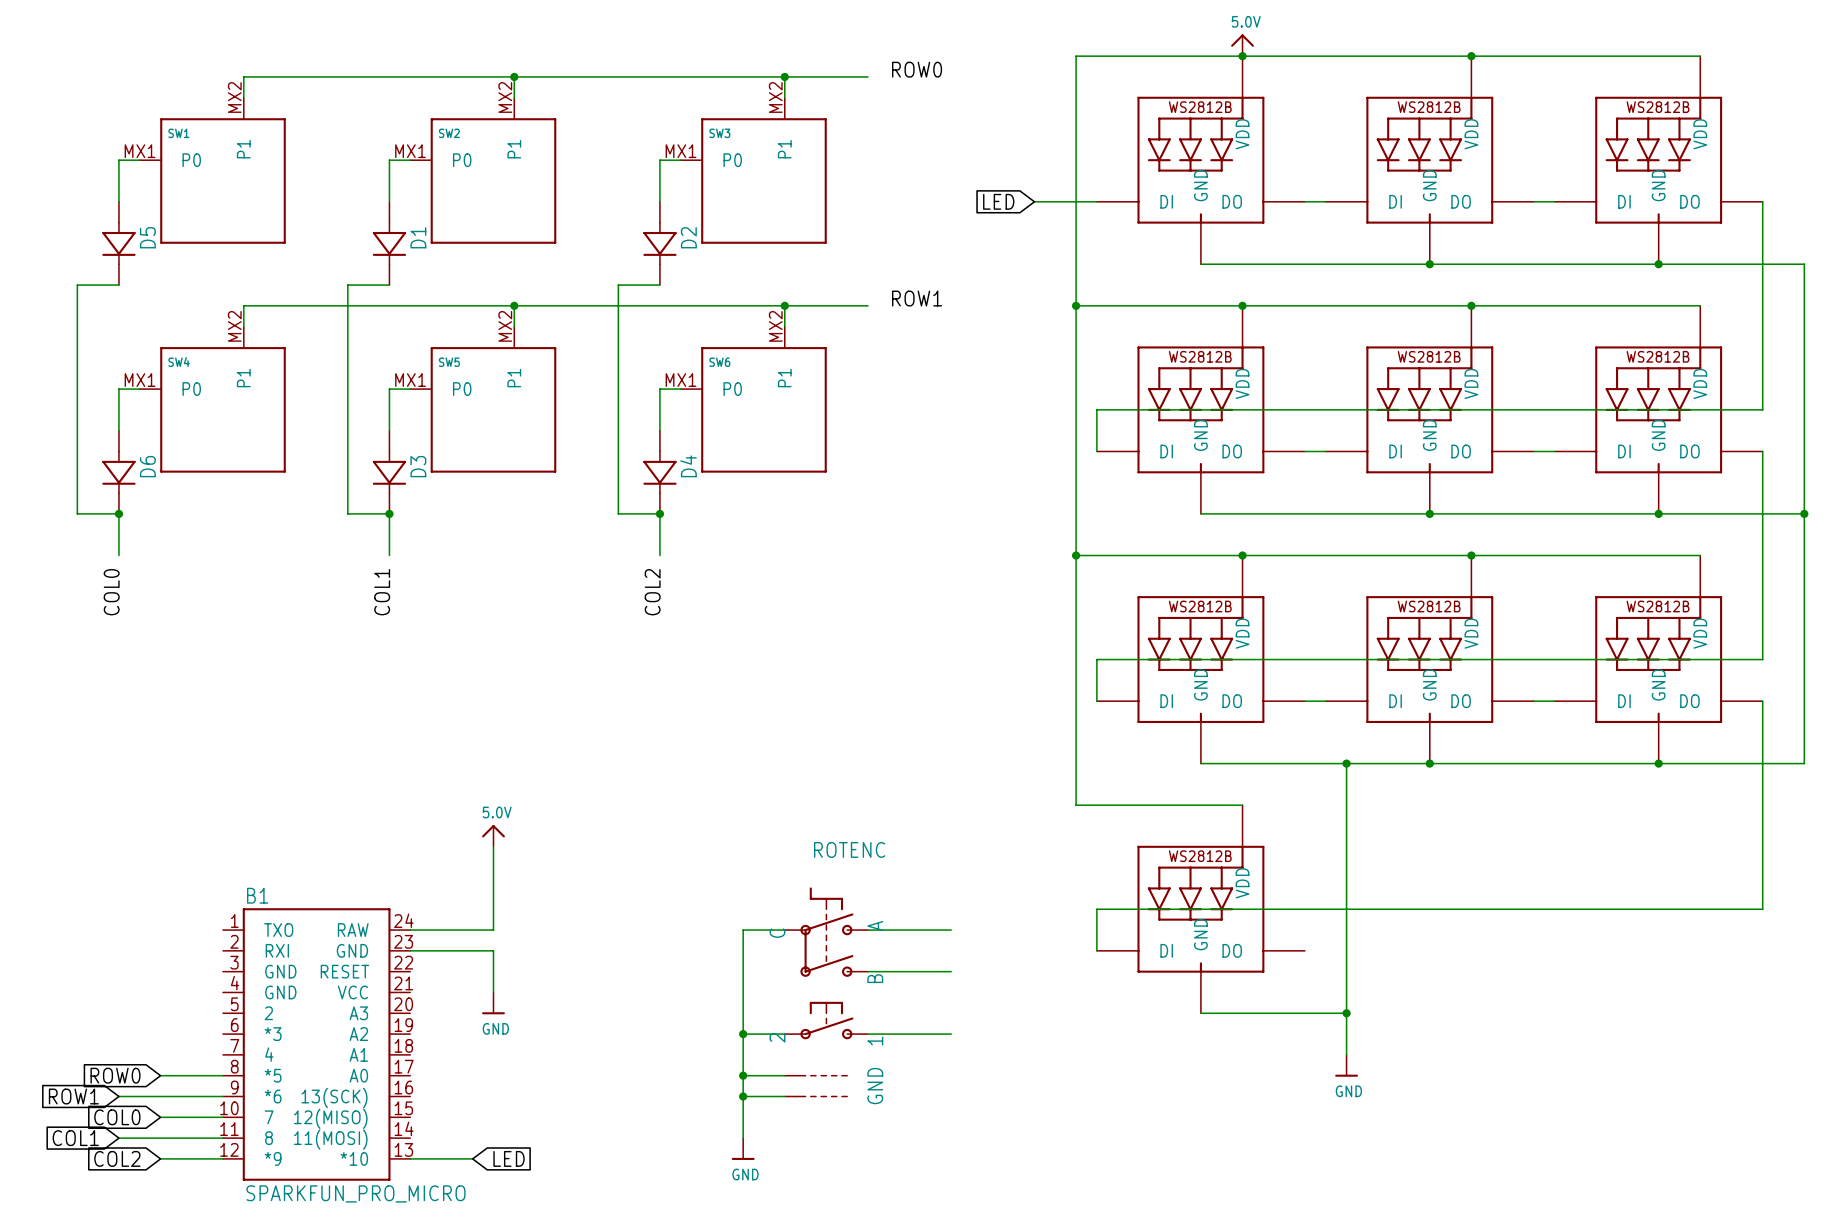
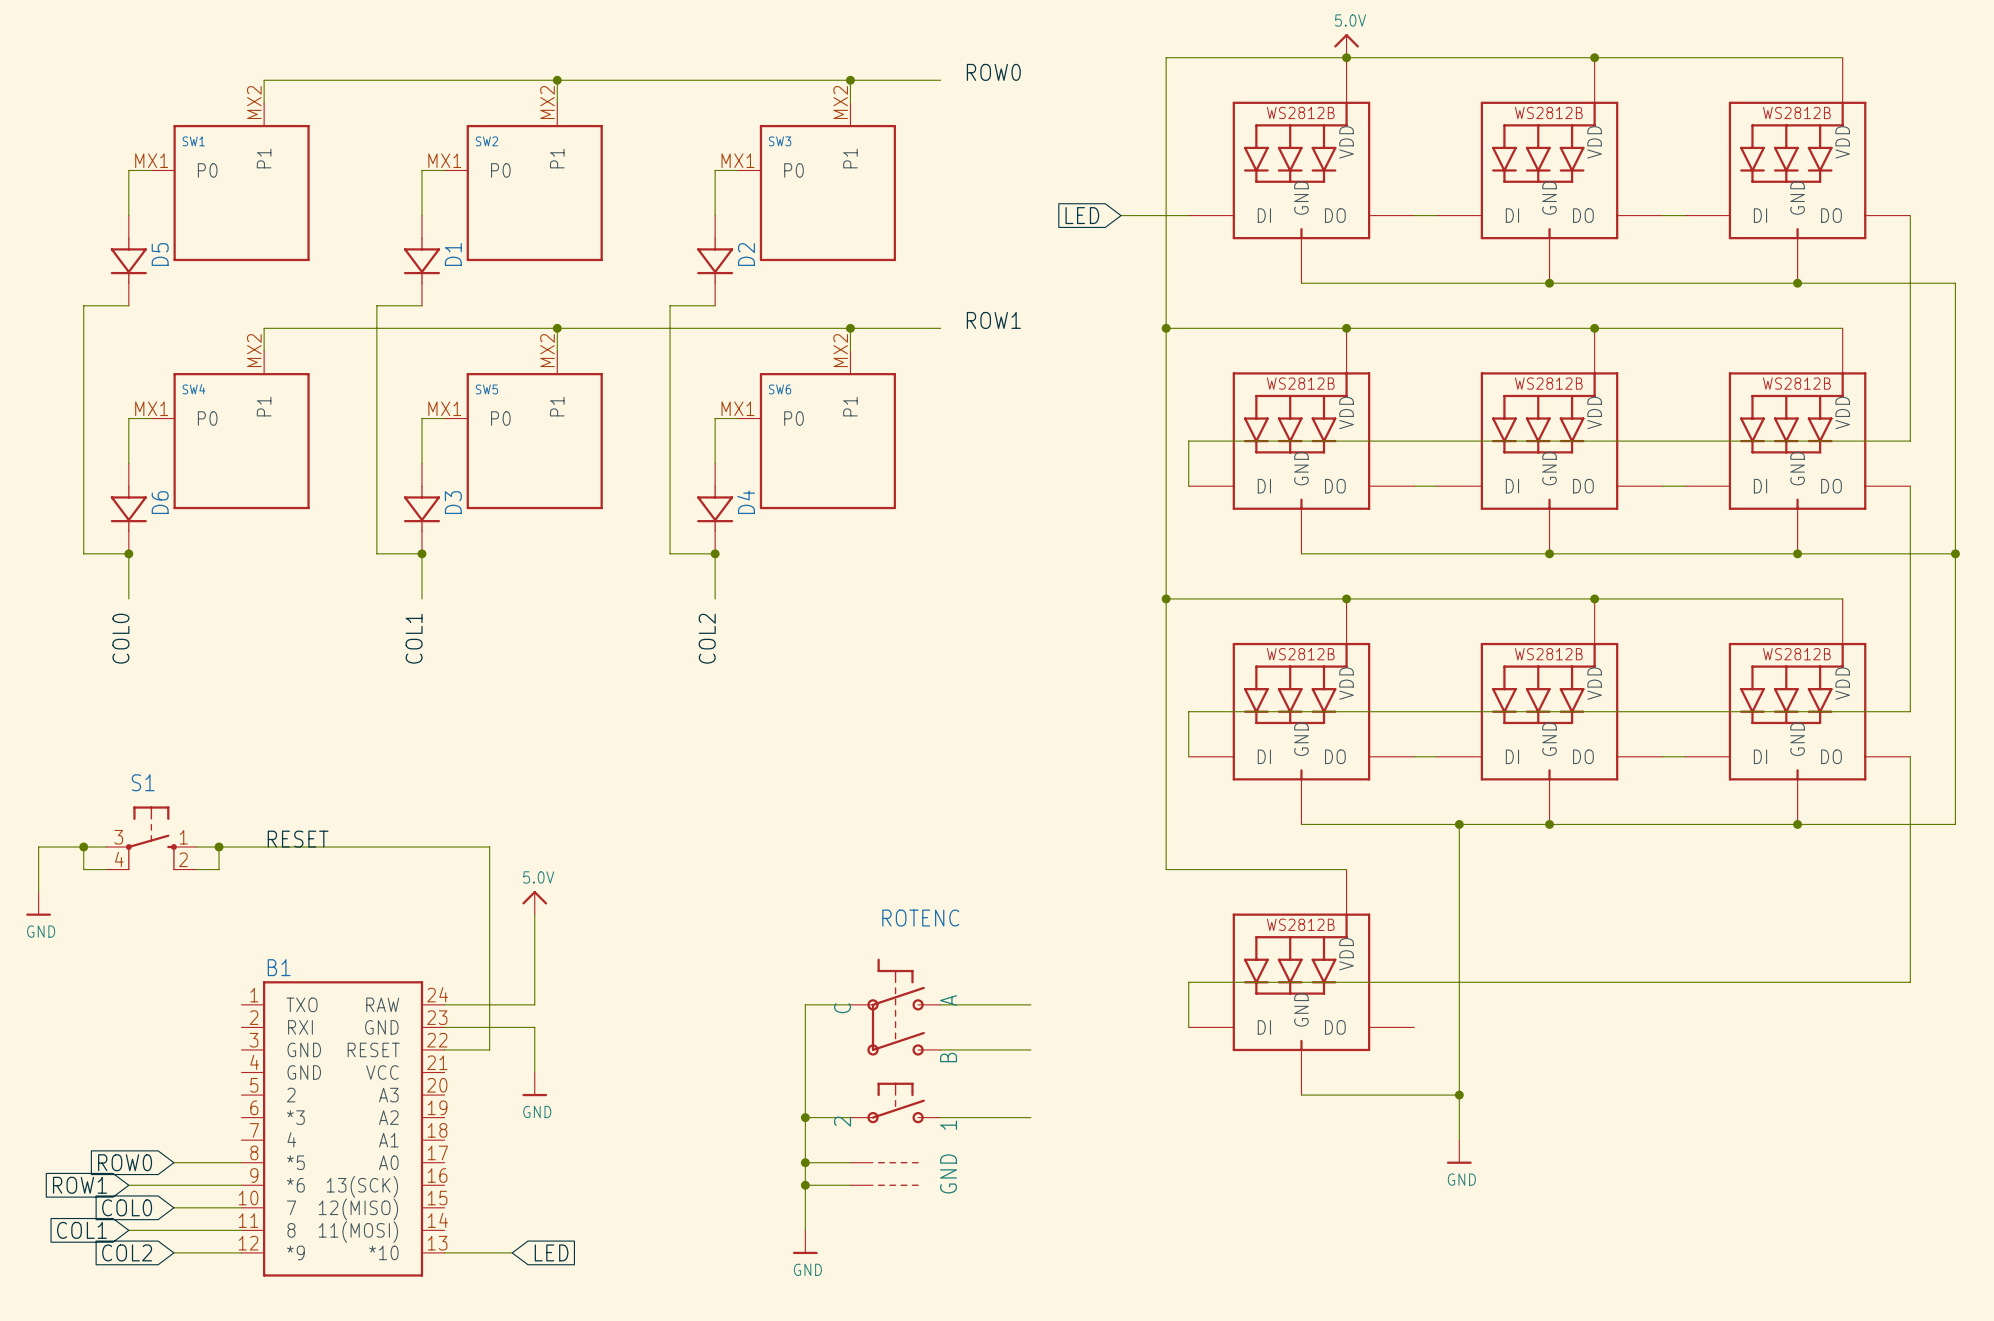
S1: none -> (151, 838)
label: none -> RESET (298, 839)
wire: none -> (83, 847) (83, 869) (106, 869)
junction: none -> (83, 847)
wire: none -> (106, 847) (38, 847) (38, 892)
wire: none -> (196, 847) (489, 847) (489, 1049) (444, 1049)
wire: none -> (219, 847) (219, 869) (196, 869)
junction: none -> (219, 847)
power symbol: none -> GND (38, 903)
B1 value: SPARKFUN_PRO_MICRO (355, 1193) -> none

